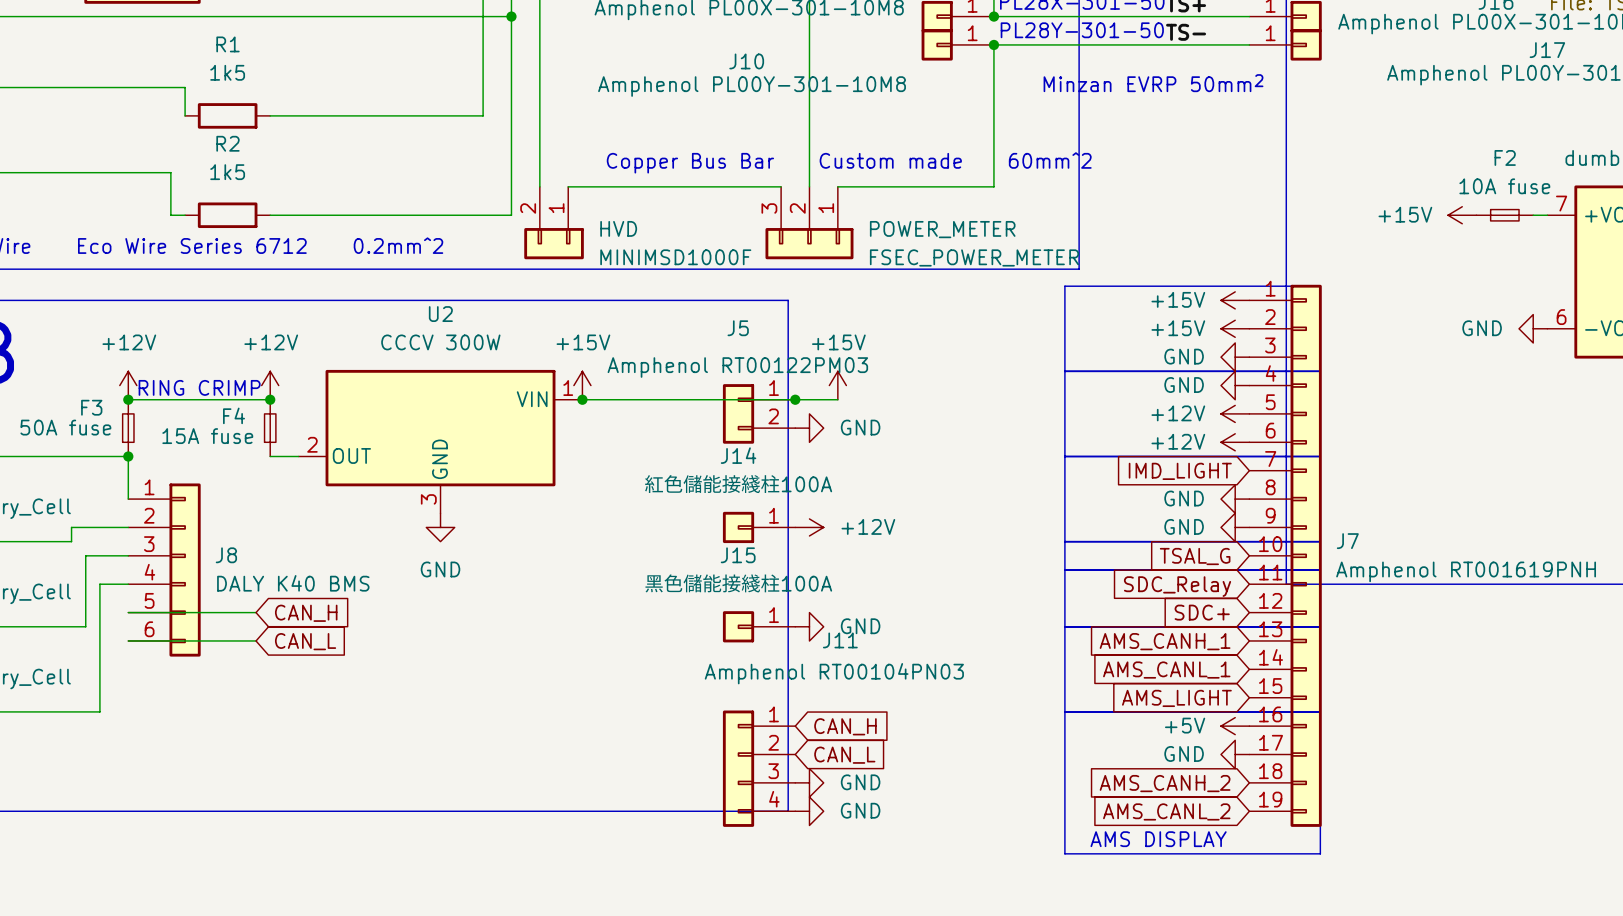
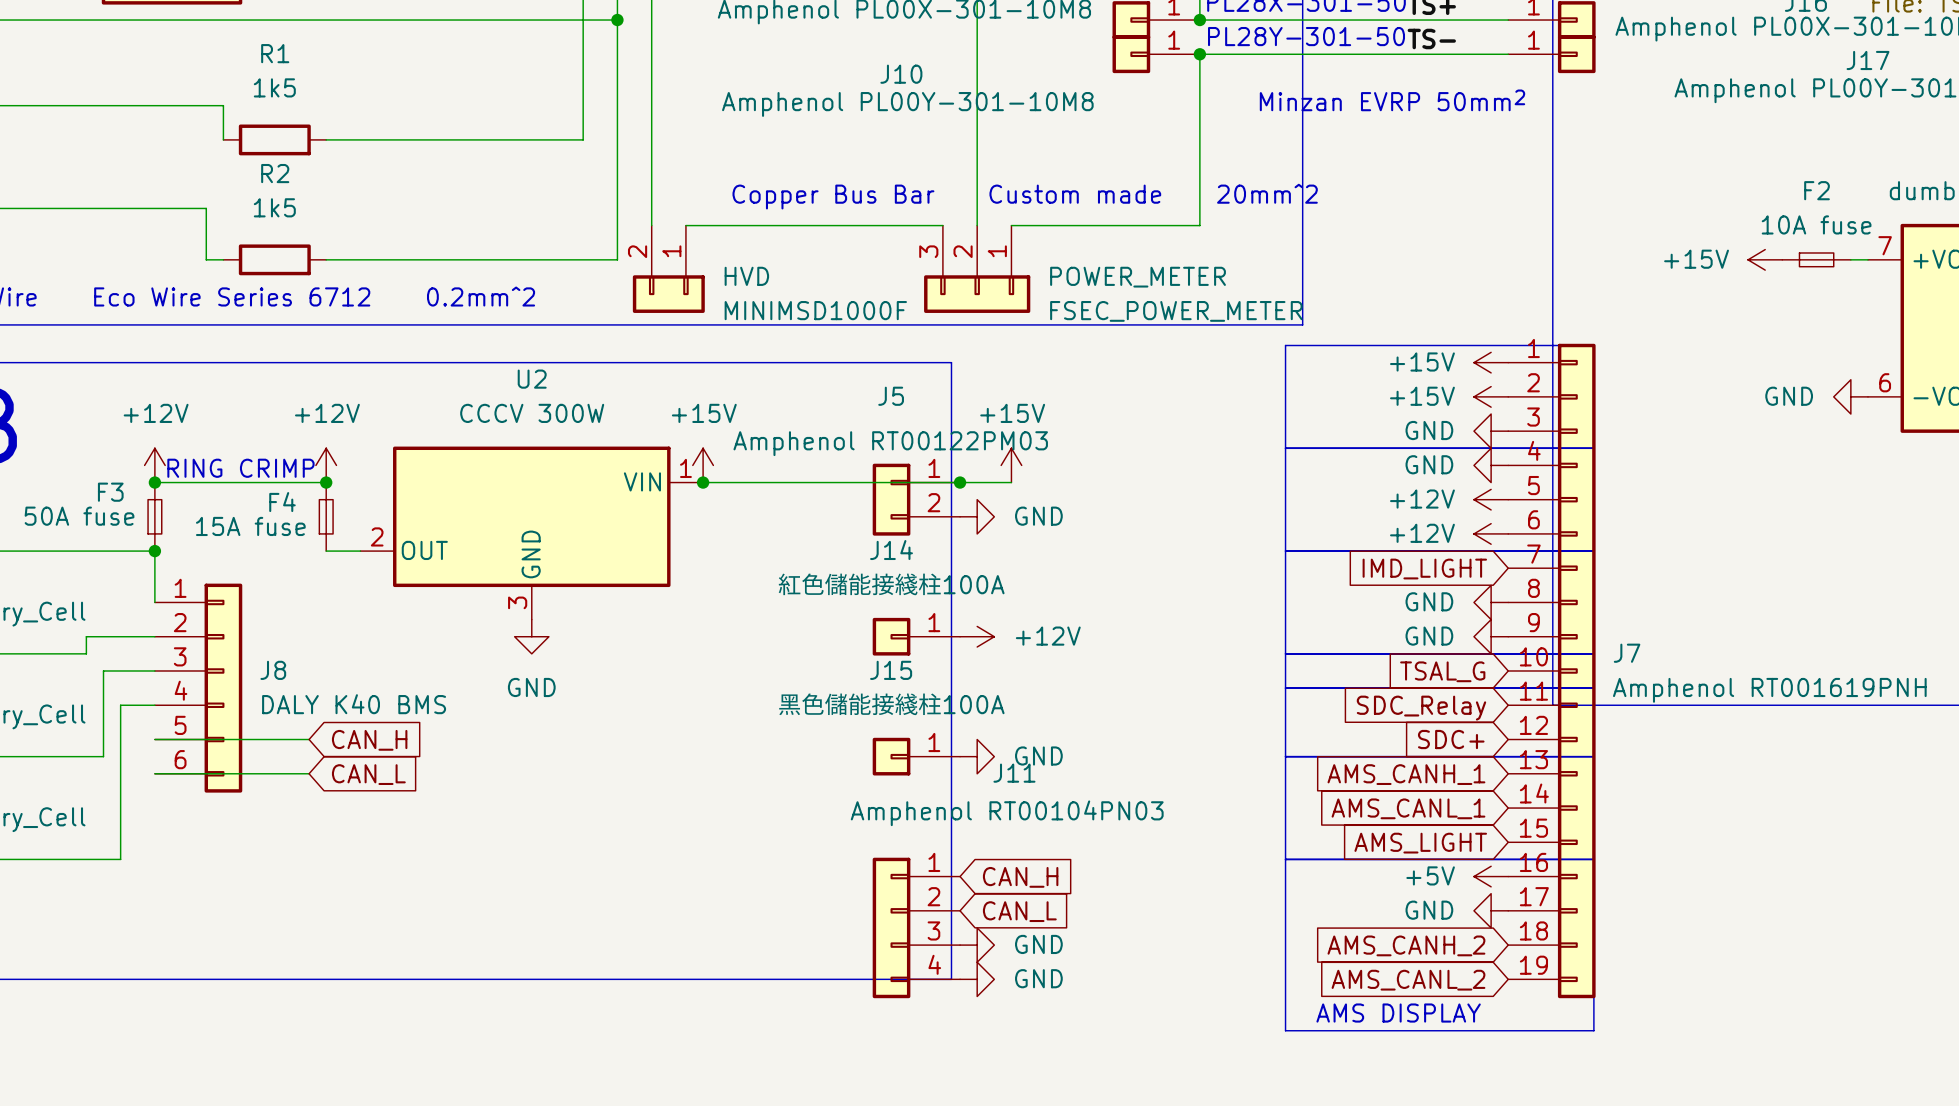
text: Copper Bus Bar Custom made 60mm^2 (849, 162) -> Copper Bus Bar Custom made 20mm^2 (1025, 196)

